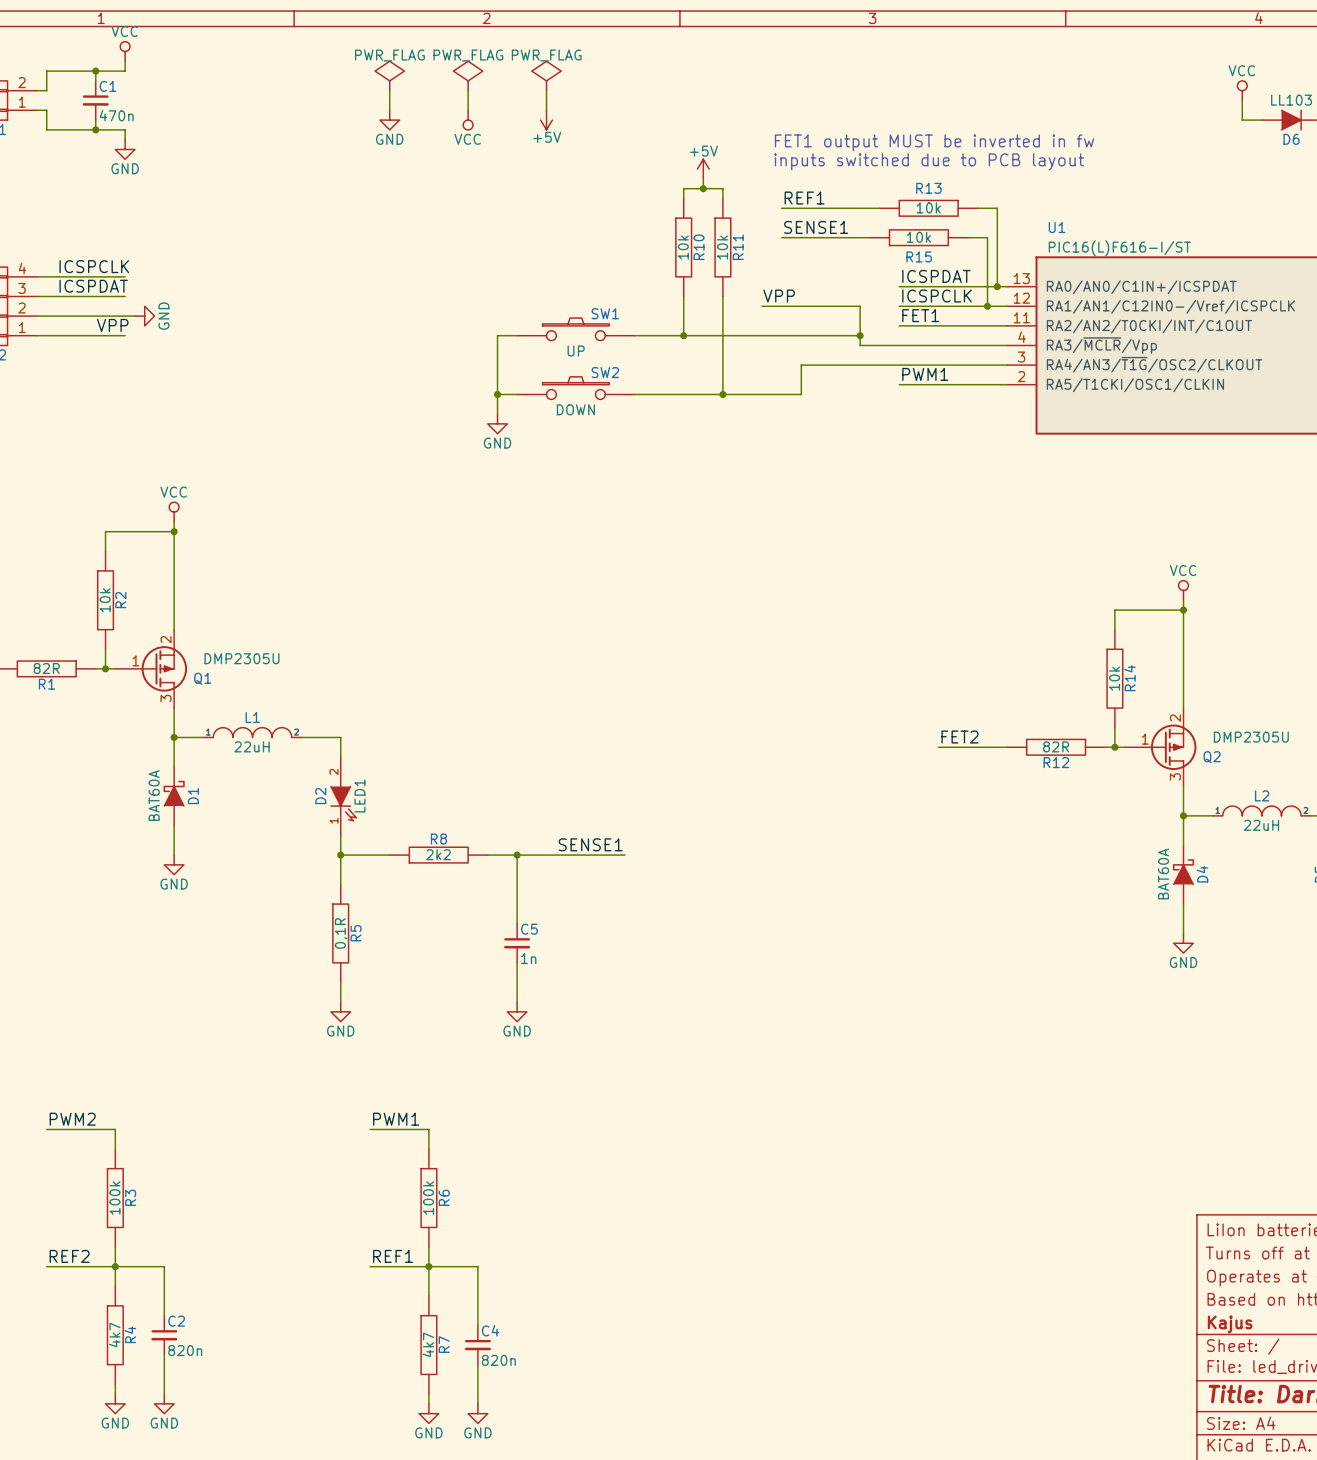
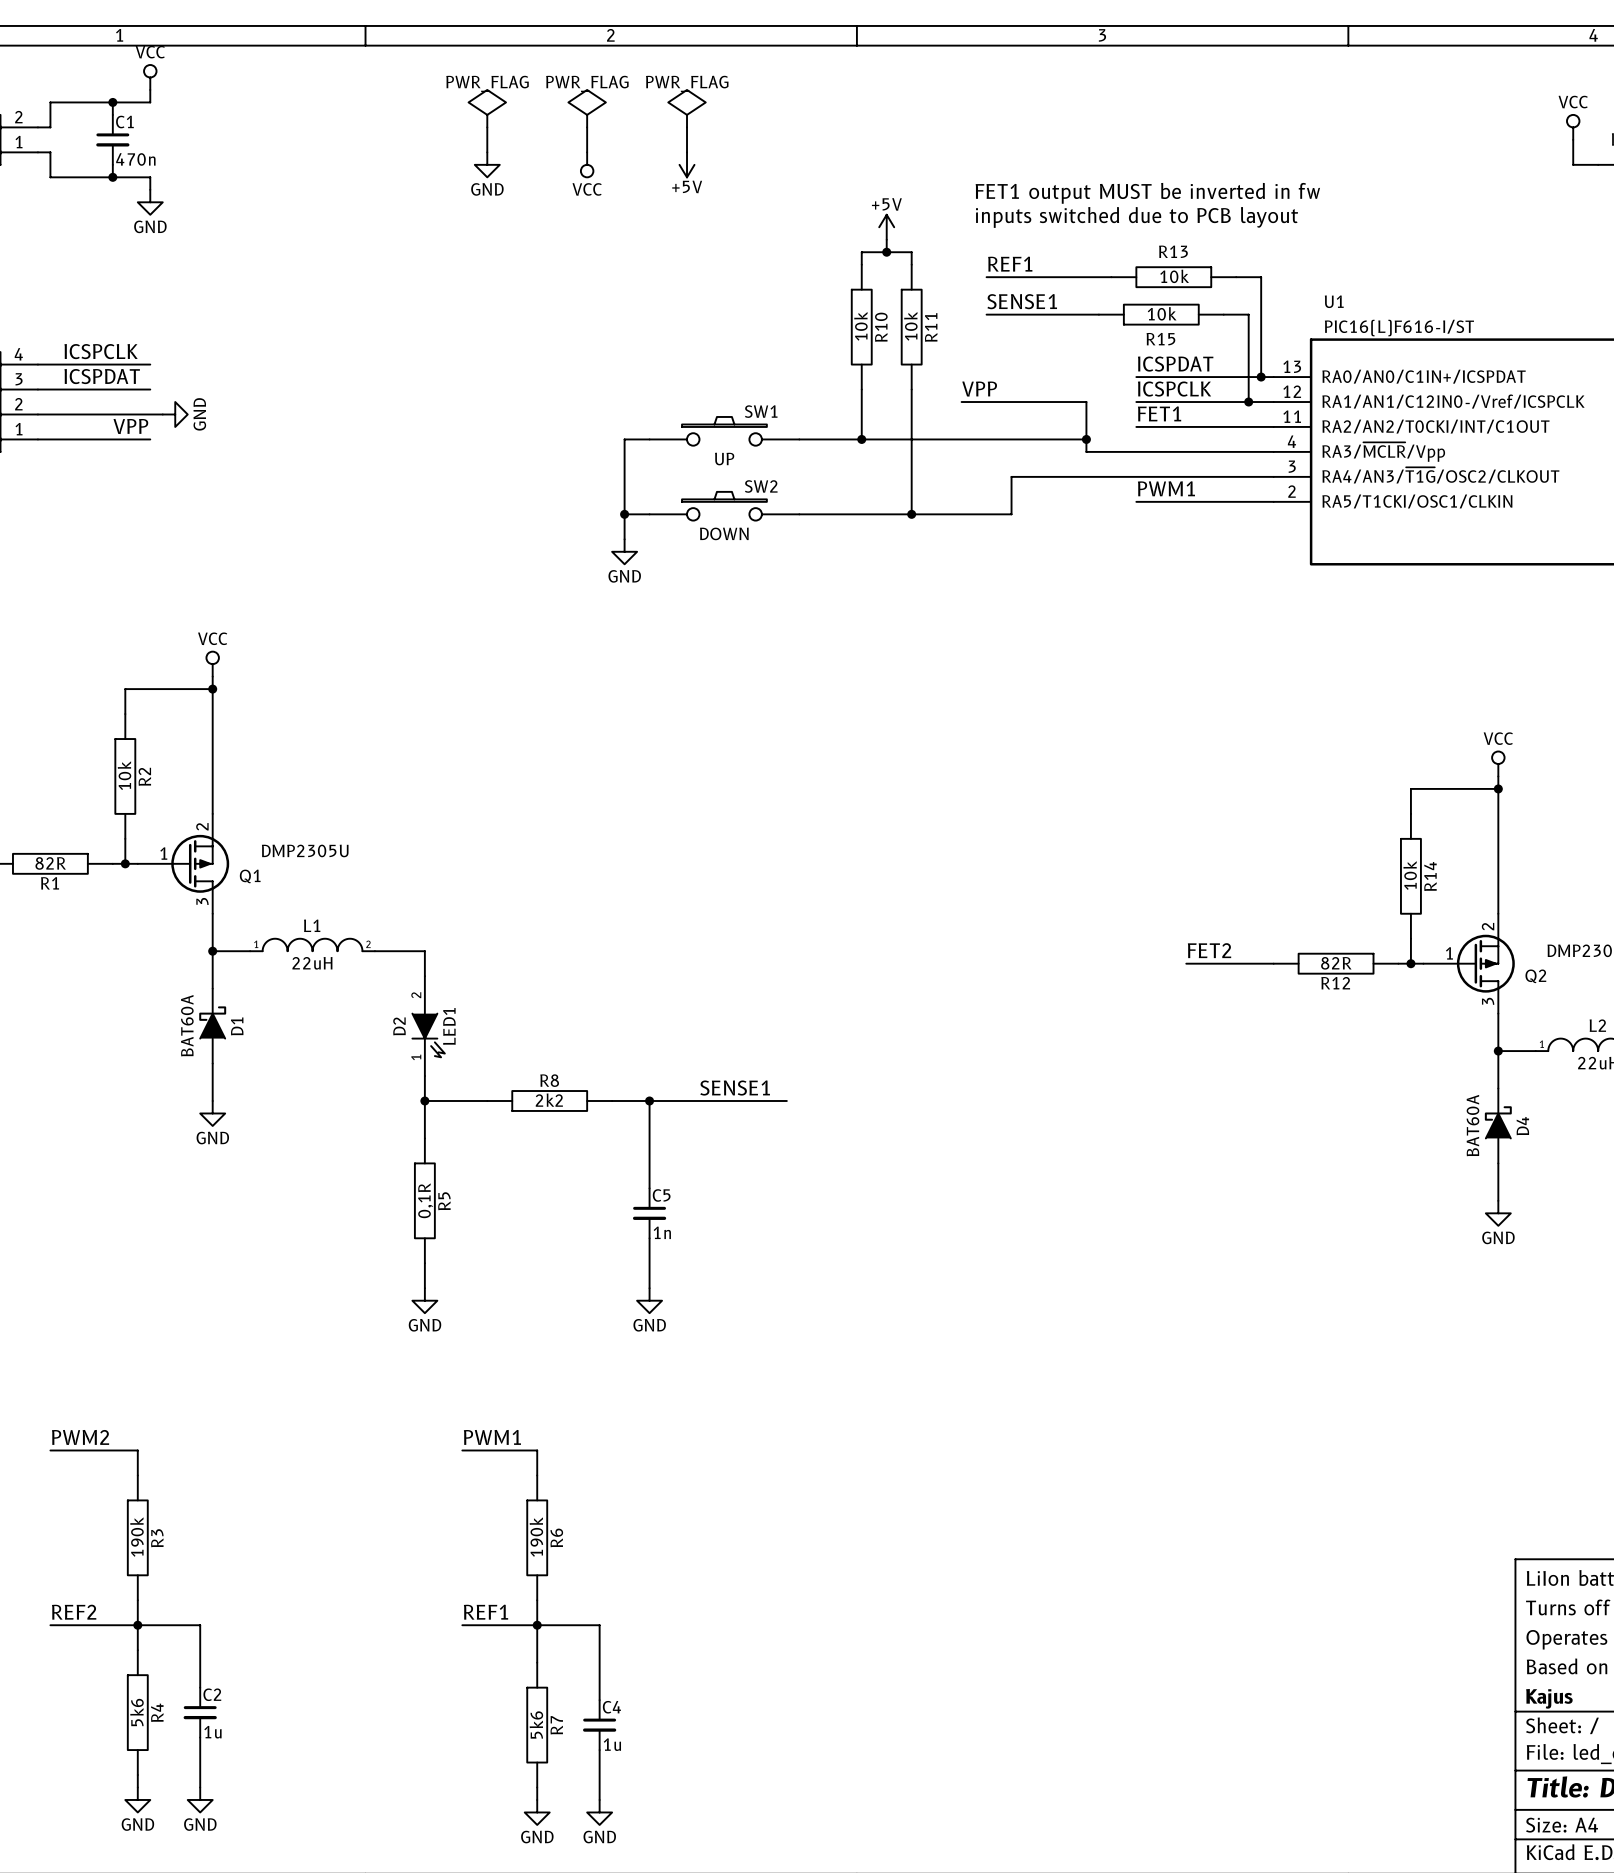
R3 value: 100k (114, 1198) -> 190k (136, 1537)
R6 value: 100k (428, 1198) -> 190k (536, 1537)
R4 value: 4k7 (114, 1335) -> 5k6 (136, 1712)
R7 value: 4k7 (428, 1344) -> 5k6 (536, 1724)
C2 value: 820n (185, 1350) -> 1u (212, 1732)
C4 value: 820n (498, 1360) -> 1u (612, 1744)

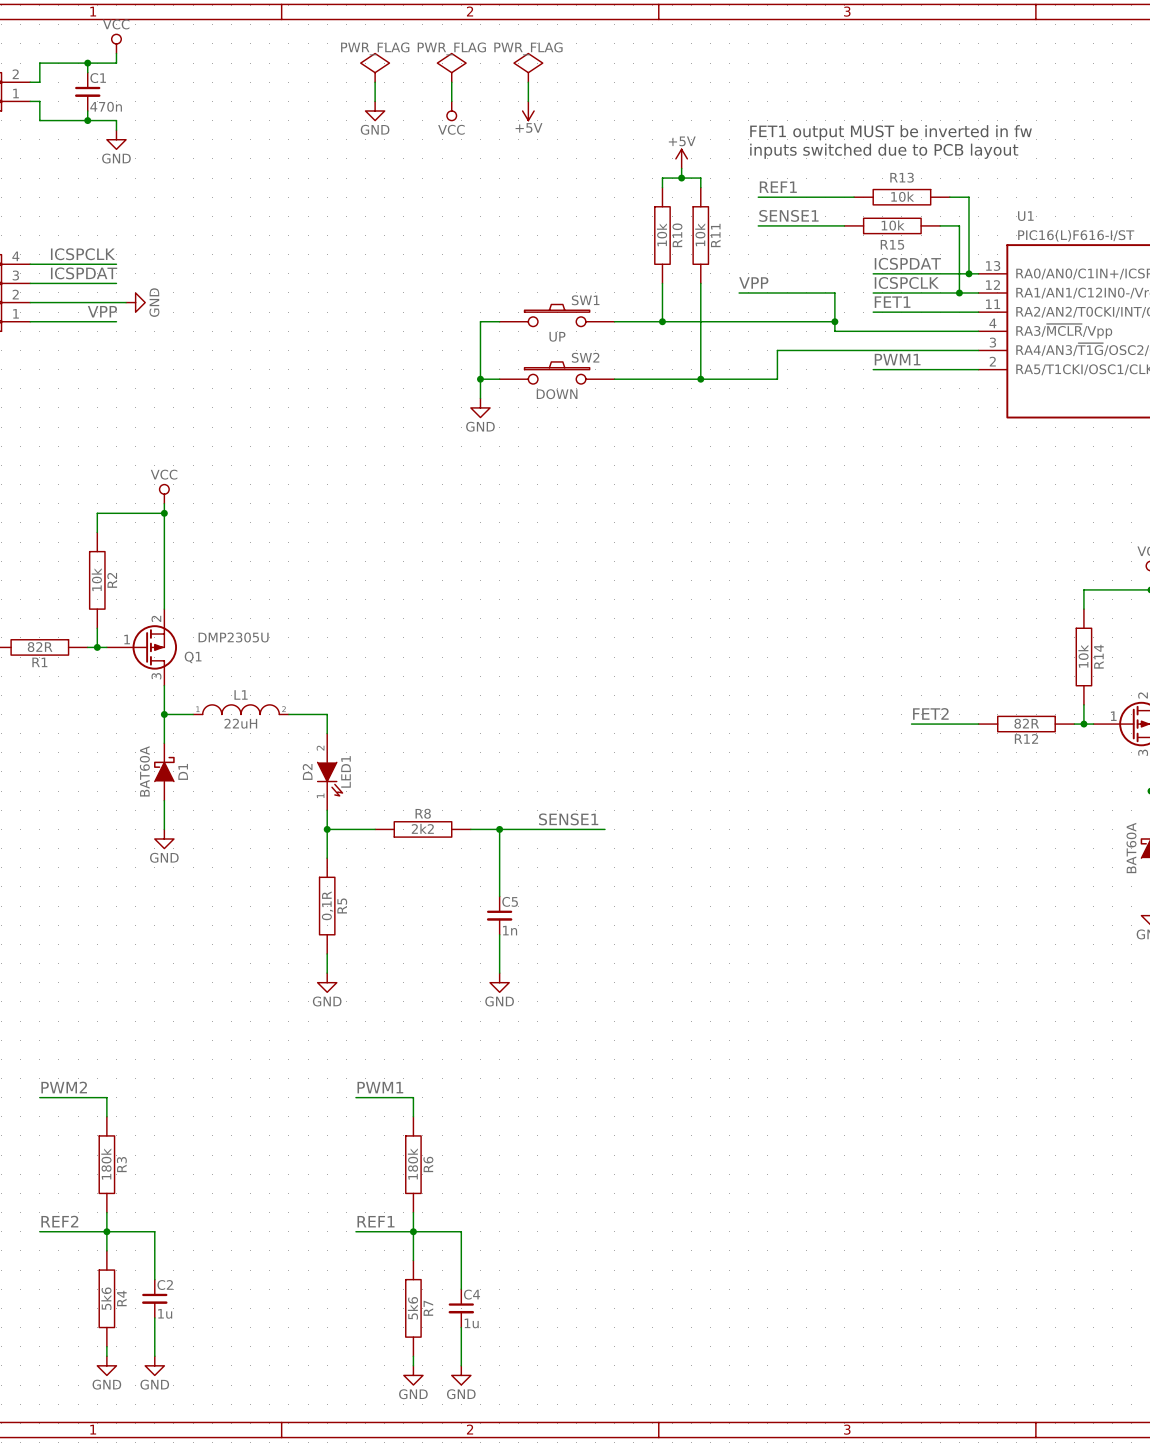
R3 value: 190k (136, 1537) -> 180k (106, 1163)
R6 value: 190k (536, 1537) -> 180k (412, 1163)

